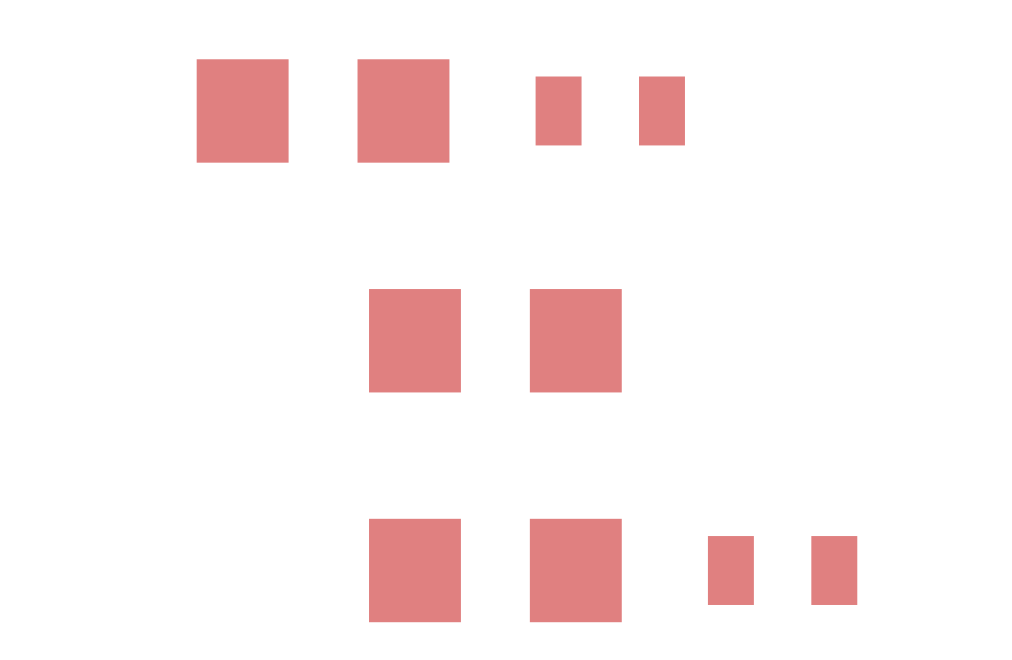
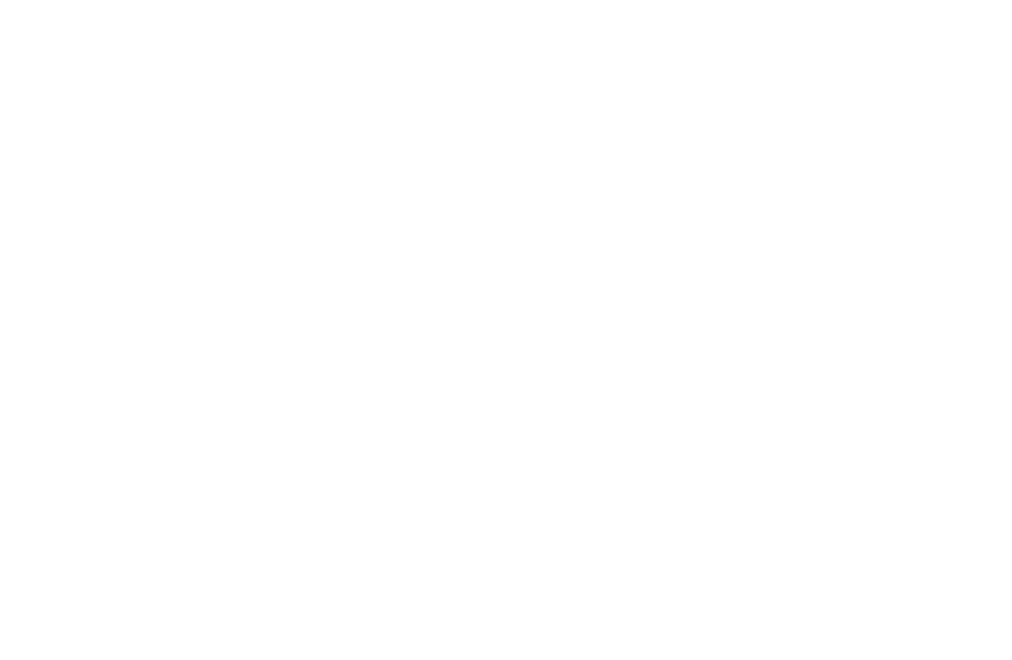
part: (323, 110) -> none
part: (610, 110) -> none
part: (495, 340) -> none
part: (495, 570) -> none
part: (782, 570) -> none

